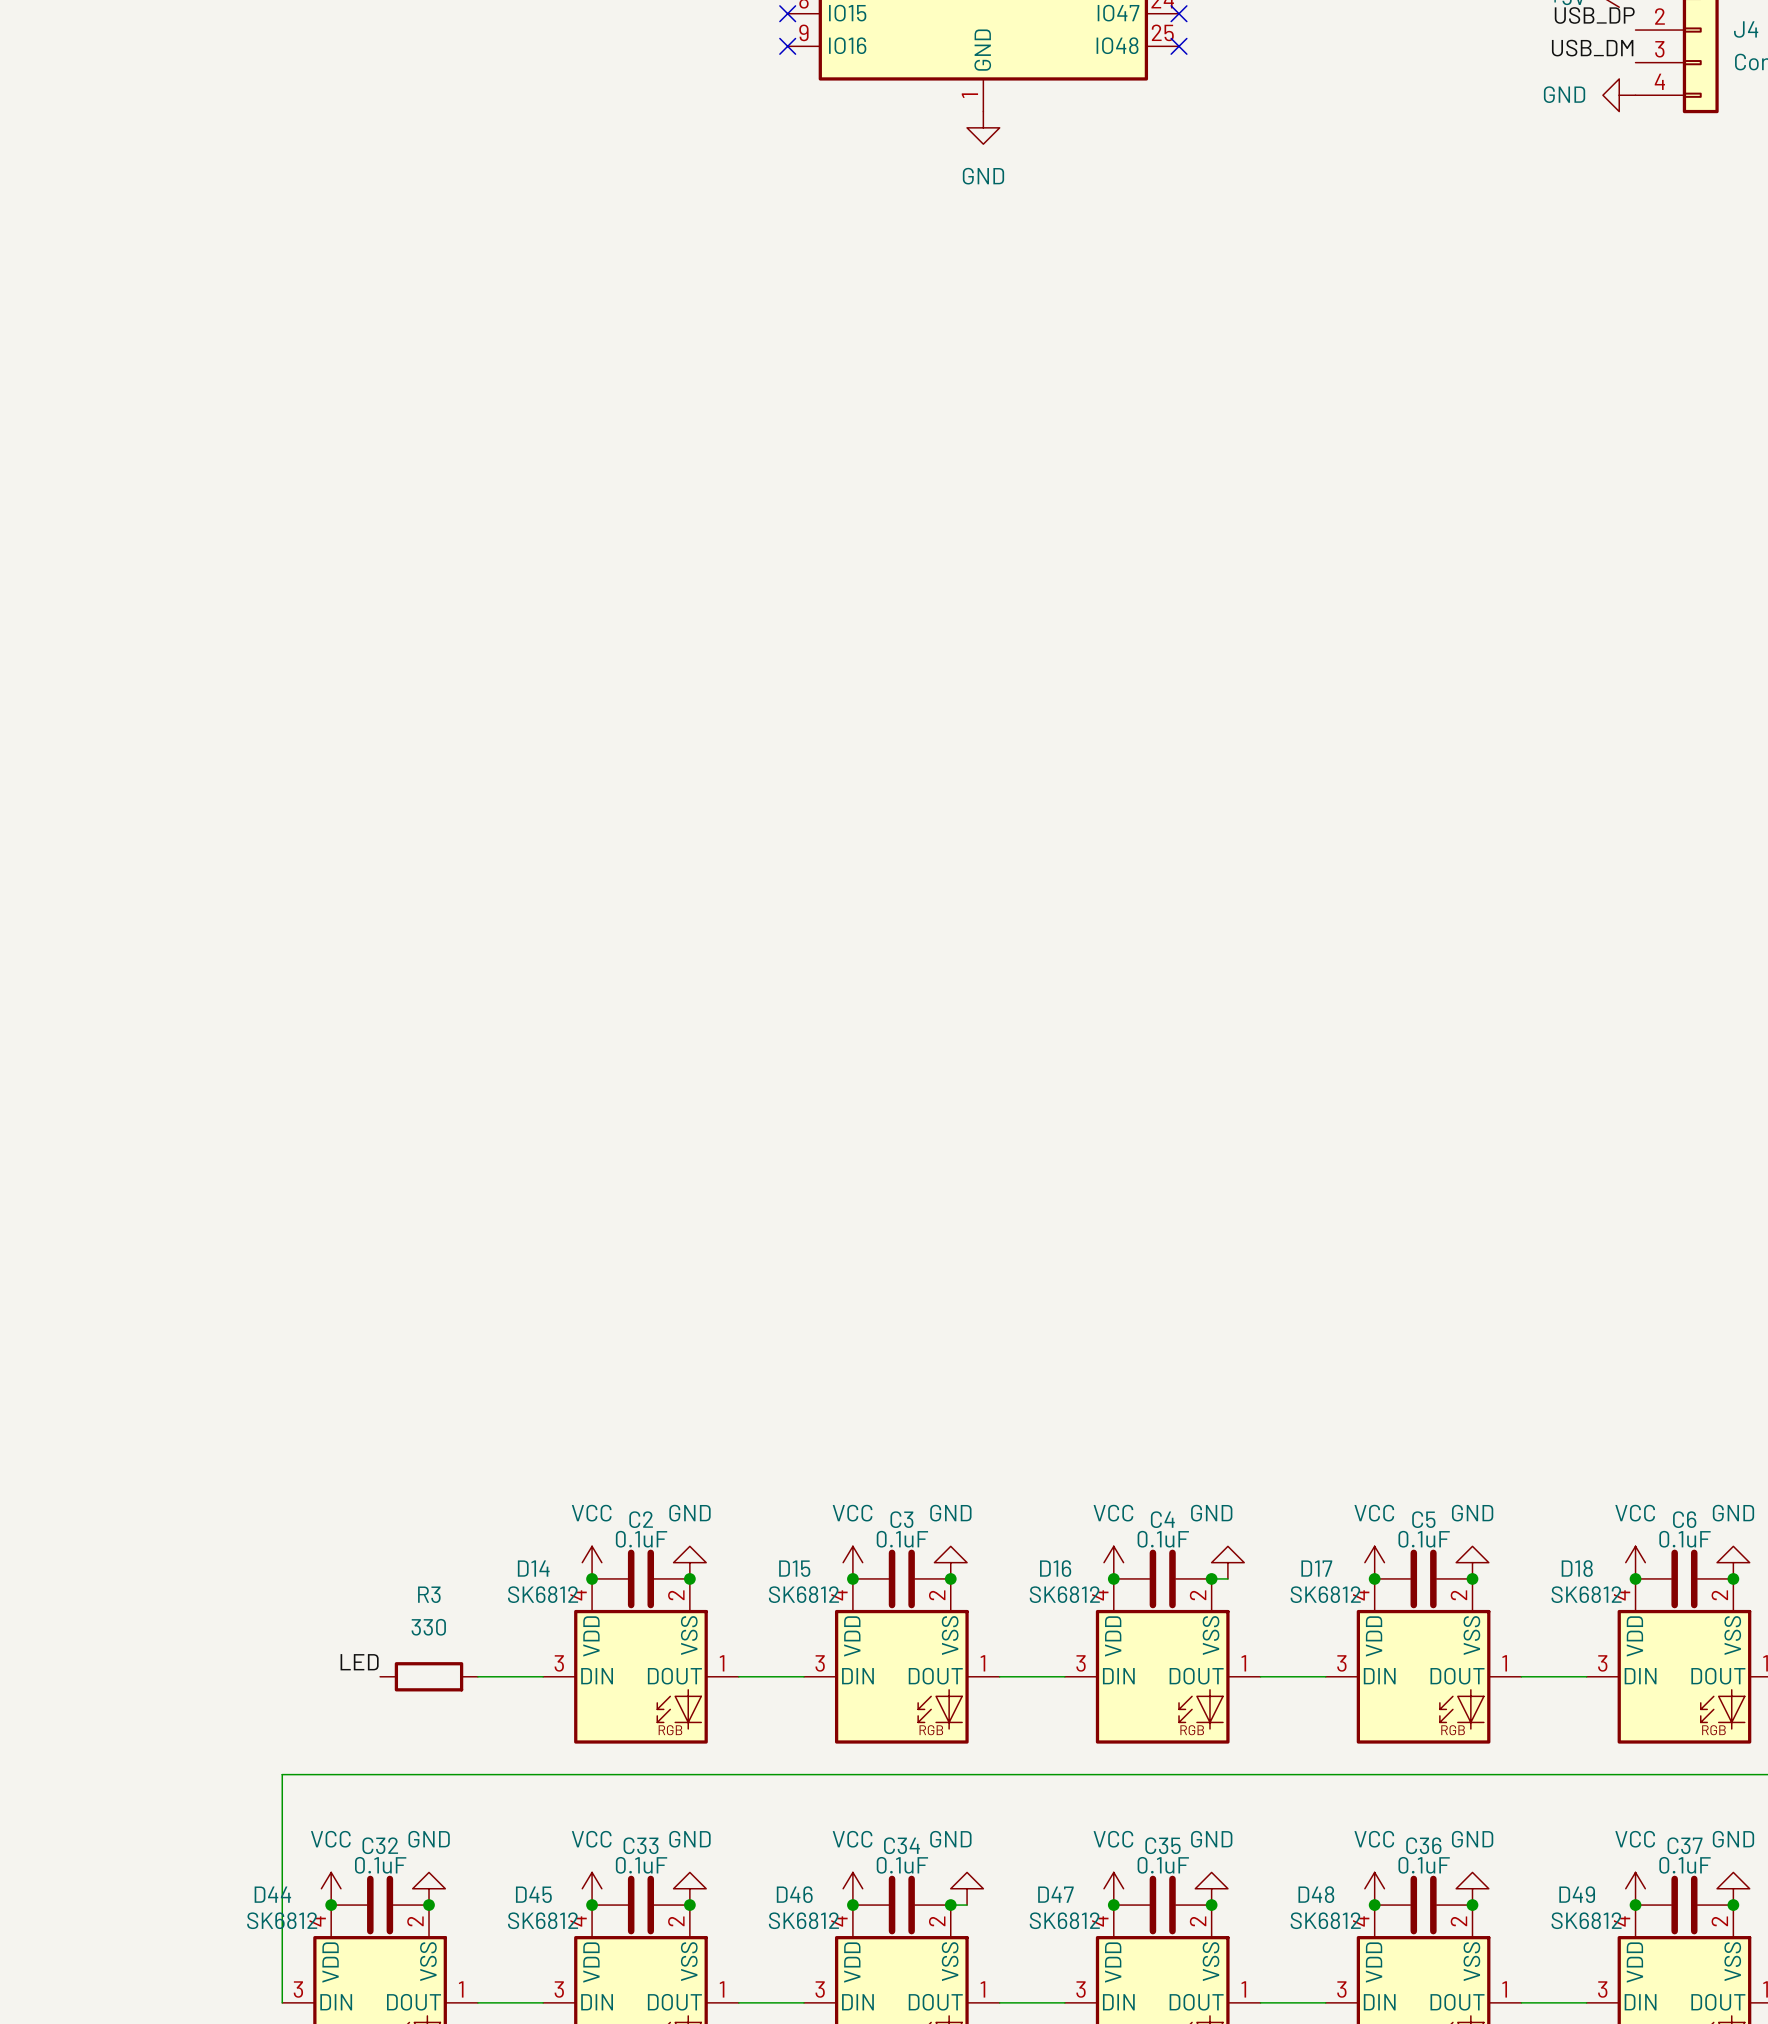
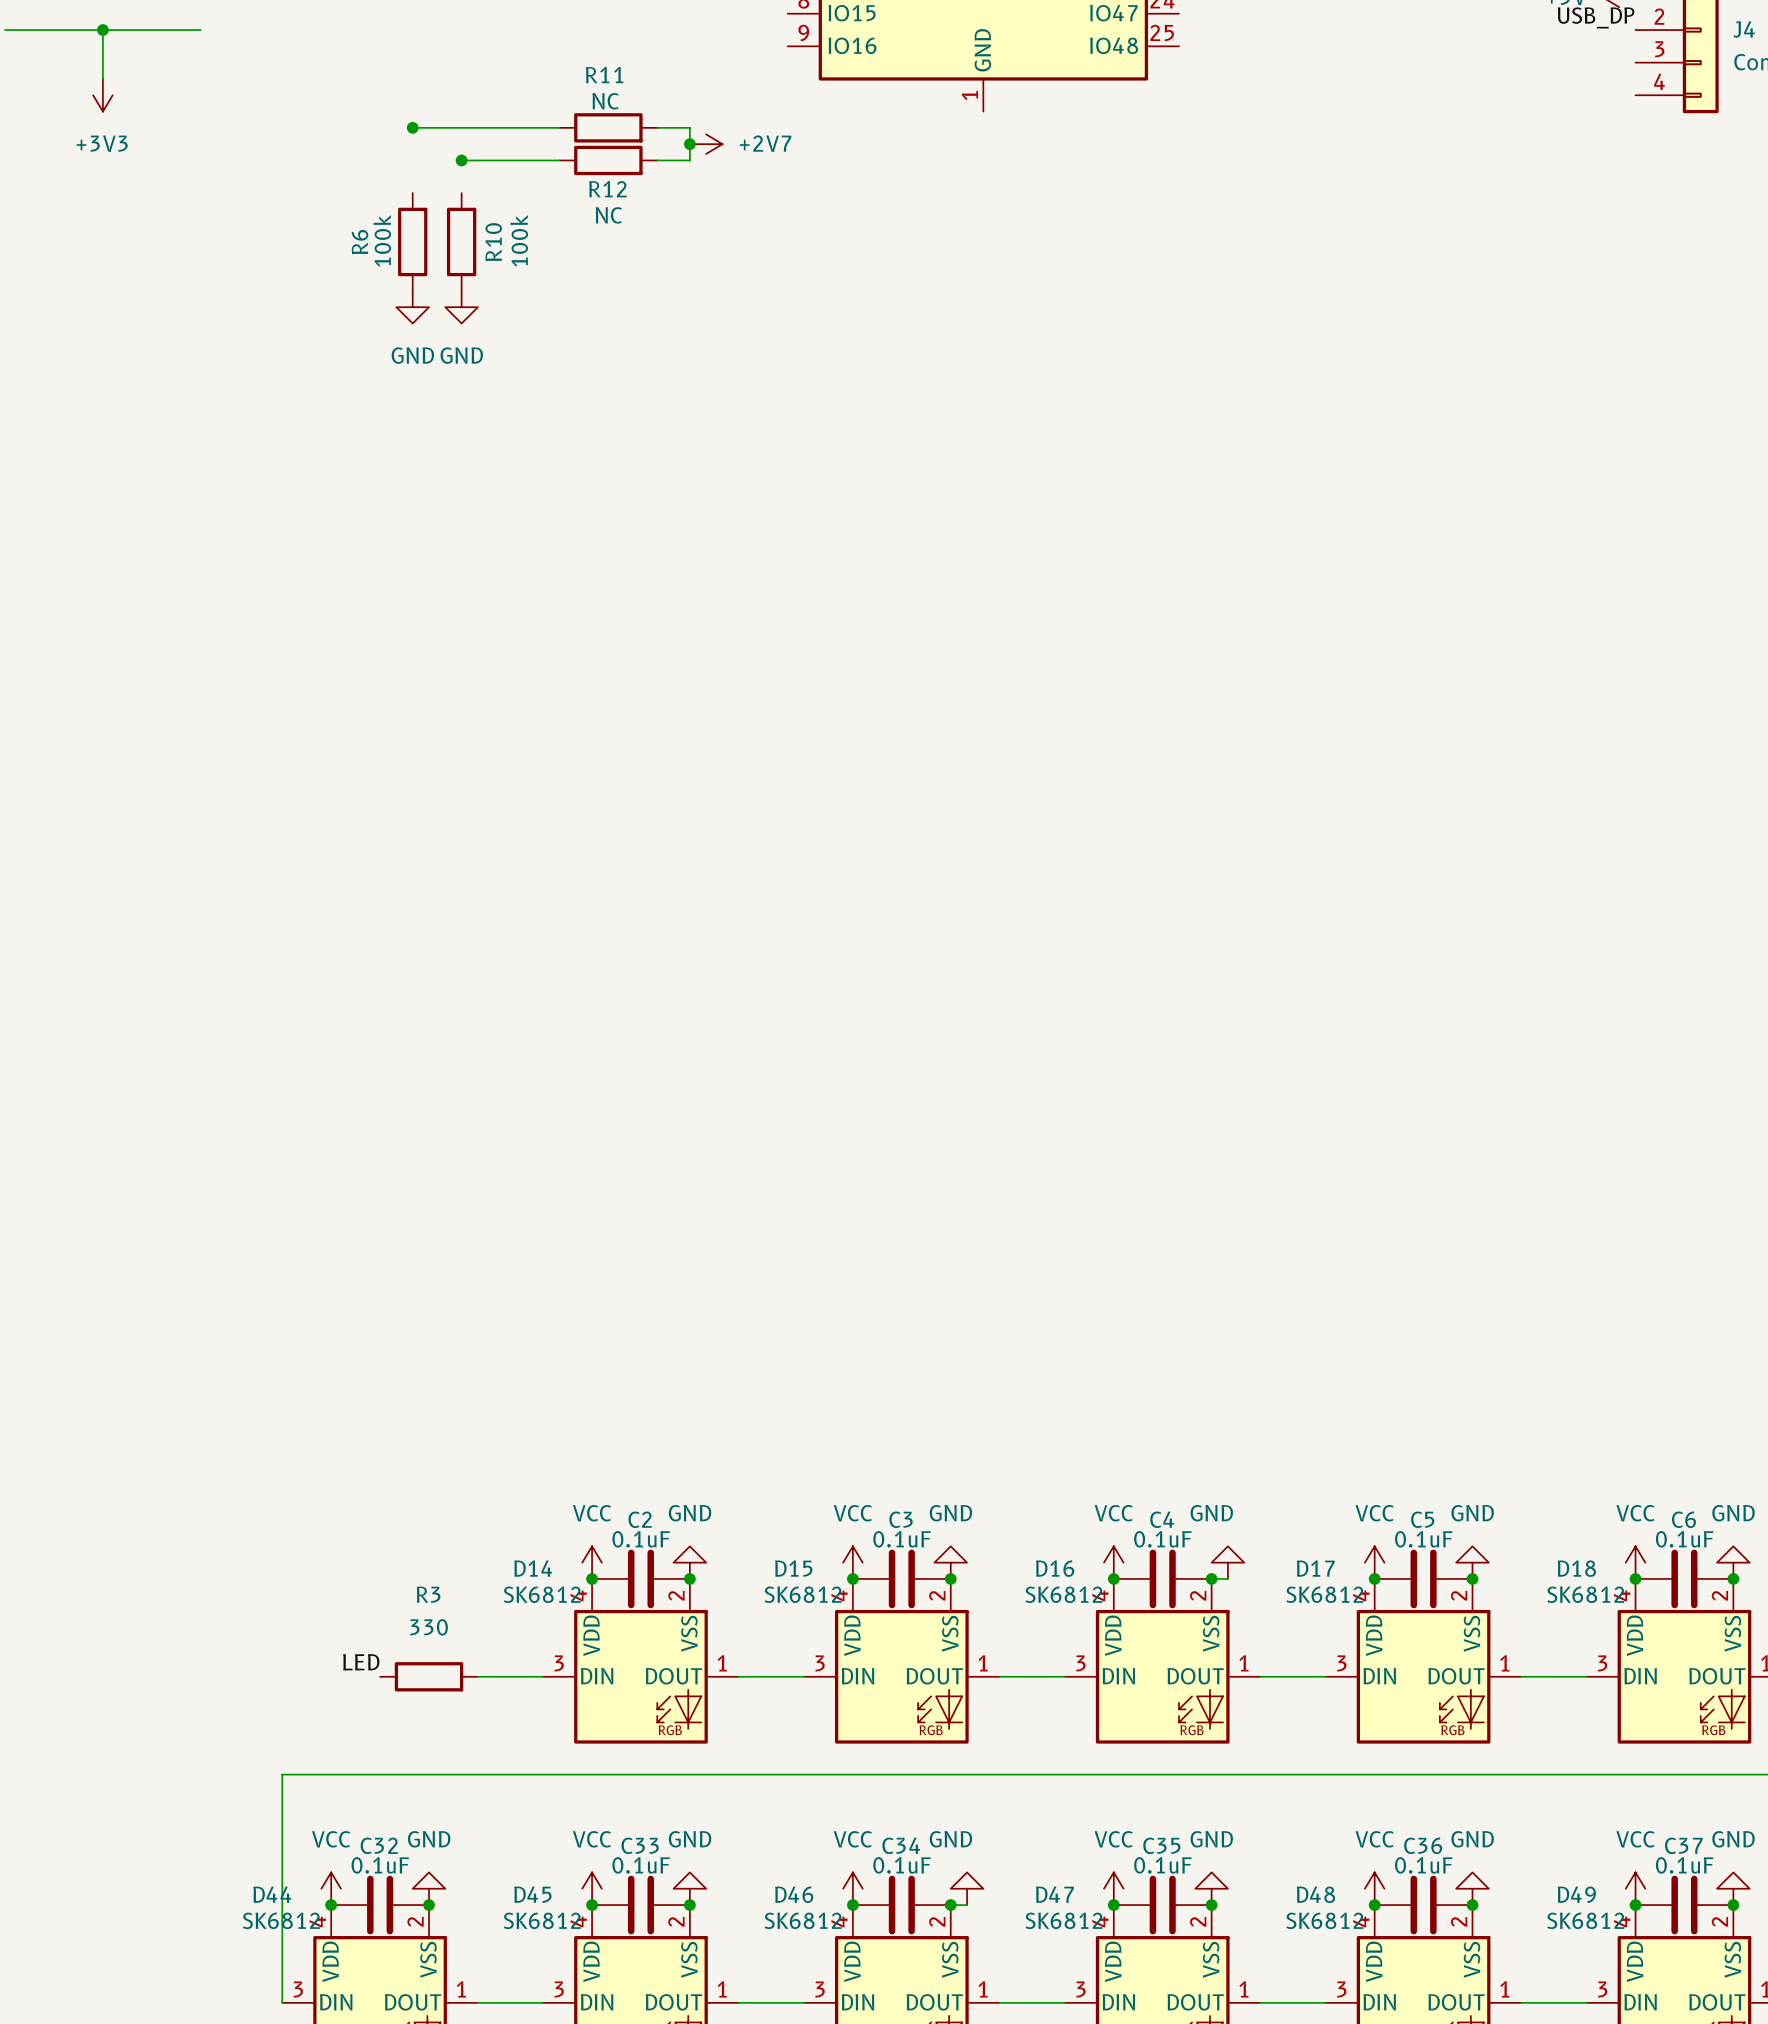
no-connect mark: (787, 13) -> none
no-connect mark: (1179, 13) -> none
wire: none -> (5, 30) (200, 30)
wire: none -> (102, 30) (102, 78)
junction: none -> (102, 30)
no-connect mark: (787, 46) -> none
no-connect mark: (1179, 46) -> none
label: USB_DM (1592, 48) -> none
power symbol: none -> +3V3 (102, 95)
power symbol: GND (1619, 95) -> none
wire: none -> (412, 127) (559, 127)
junction: none -> (412, 127)
R11: none -> NC (608, 127)
wire: none -> (657, 127) (689, 127) (689, 160) (657, 160)
power symbol: GND (983, 127) -> none
junction: none -> (689, 144)
power symbol: none -> +2V7 (706, 144)
wire: none -> (461, 160) (559, 160)
junction: none -> (461, 160)
R12: none -> NC (608, 160)
R6: none -> 100k (412, 241)
R10: none -> 100k (461, 241)
power symbol: none -> GND (412, 307)
power symbol: none -> GND (461, 307)

